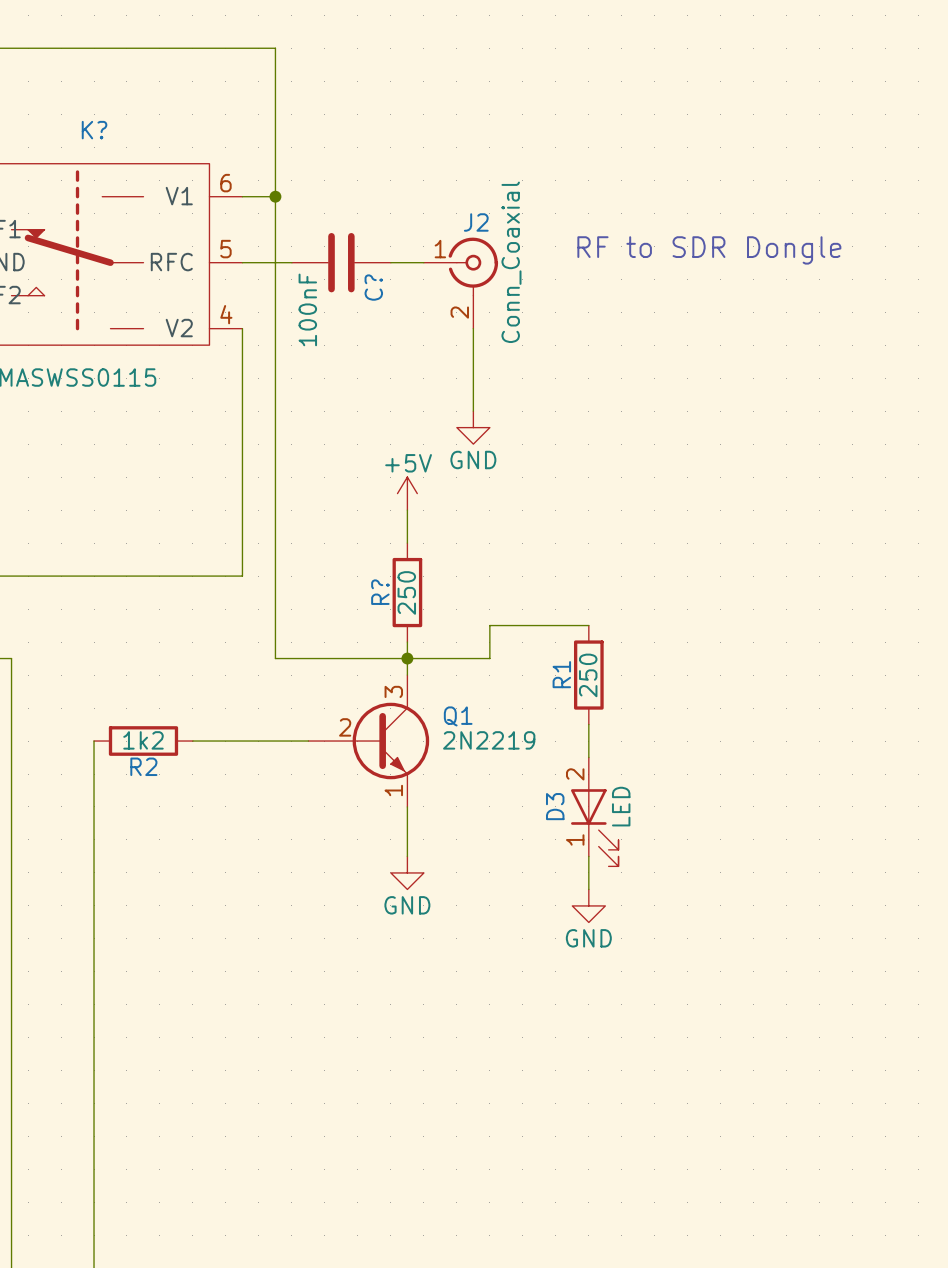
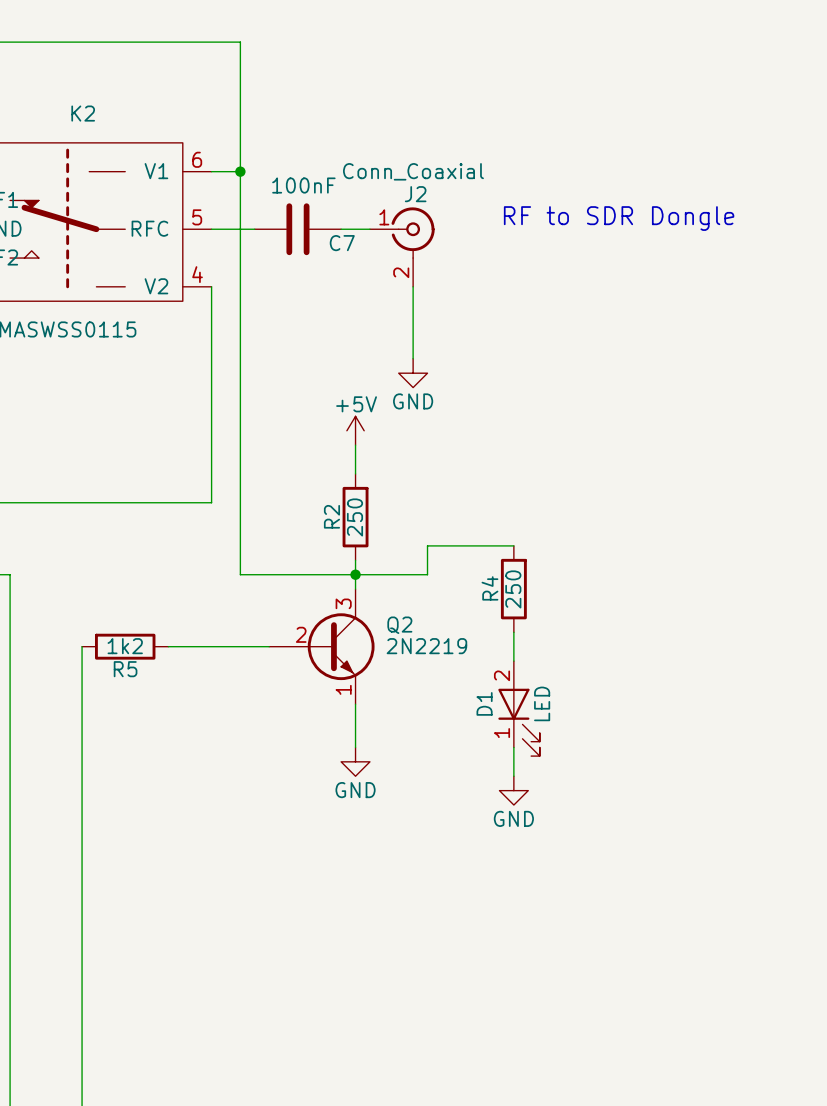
K? name: K? (94, 130) -> K2 (83, 113)
J2 value rotation: 0° (511, 262) -> 90° clockwise (413, 171)
C? name: C? (373, 287) -> C7 (342, 243)
C? value rotation: 0° (307, 309) -> 90° clockwise (303, 185)
C? value position: 100nF (307, 309) -> 100nF (303, 185)
R? name: R? (380, 592) -> R2 (331, 516)
R1 name: R1 (561, 674) -> R4 (489, 588)
Q1 name: Q1 (458, 716) -> Q2 (399, 625)
R2 name: R2 (143, 766) -> R5 (125, 669)
D3 name: D3 (555, 806) -> D1 (484, 703)

